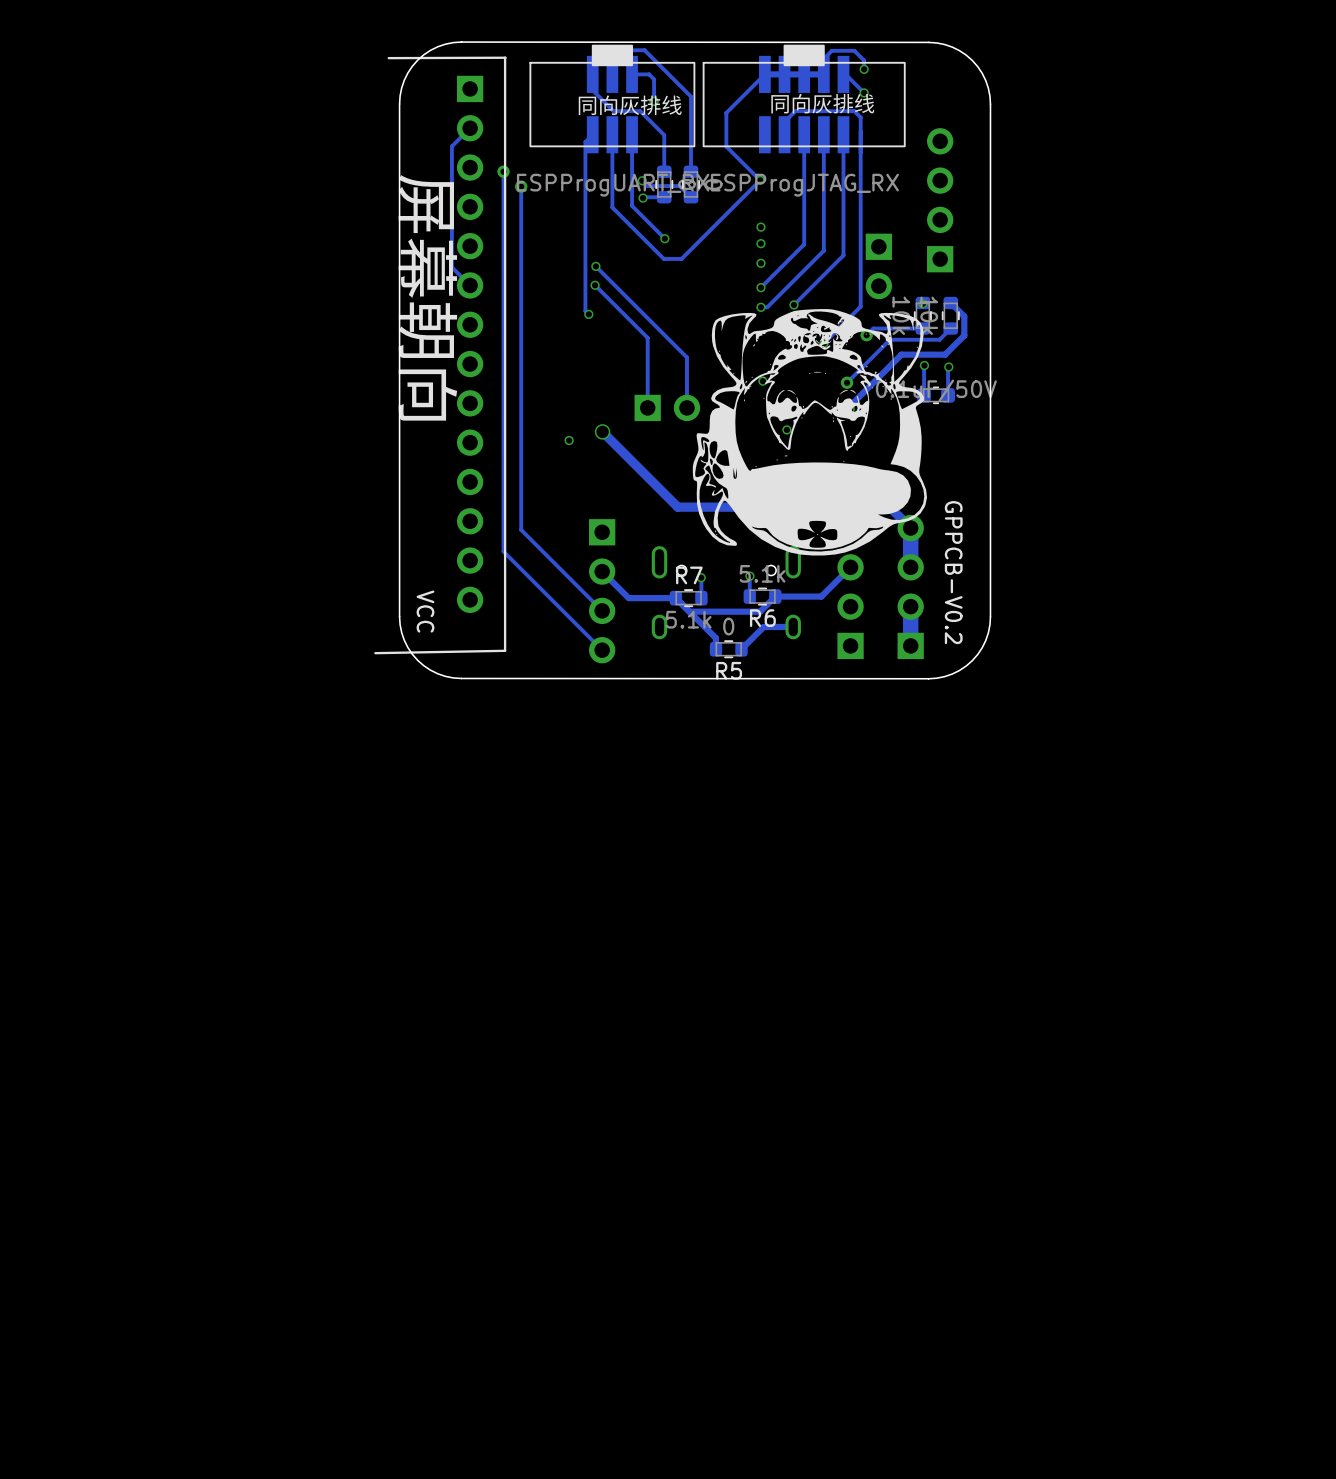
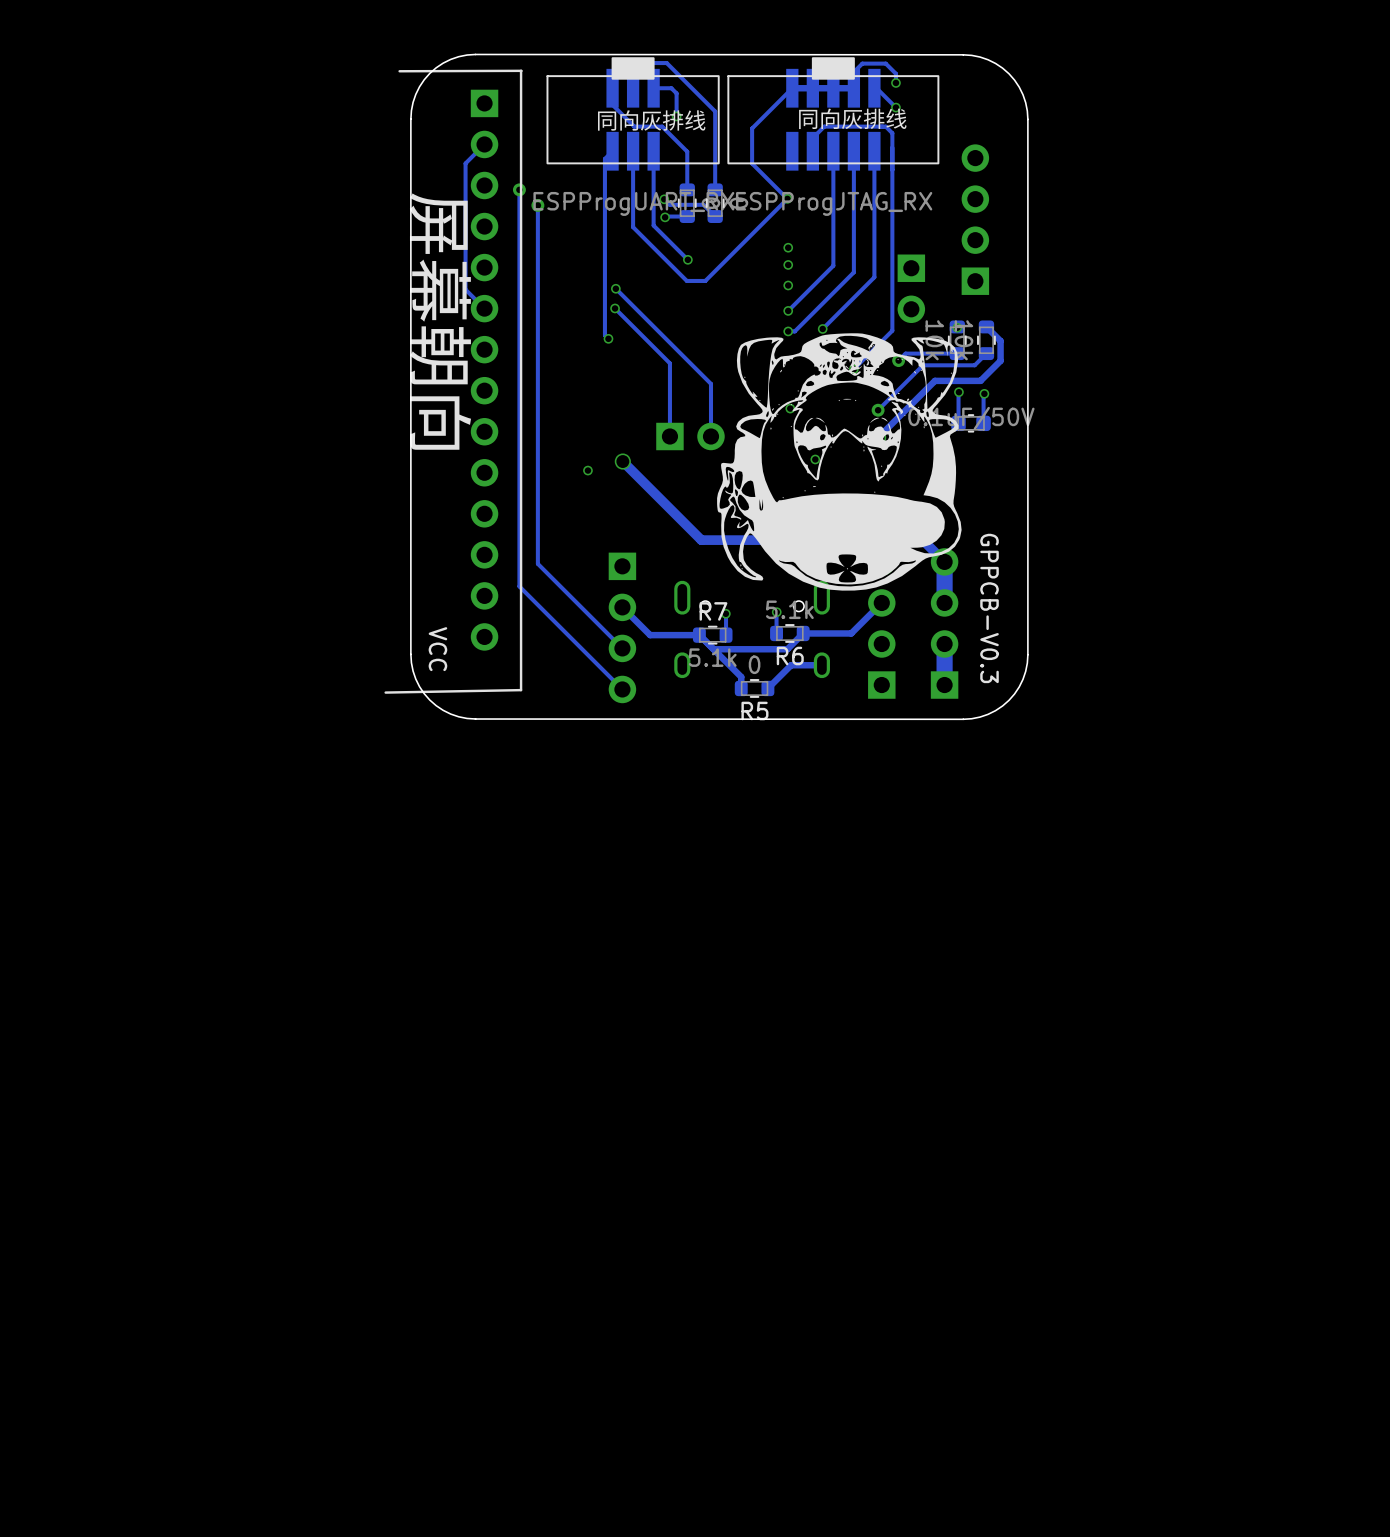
text: GPPCB-V0.2 (953, 572) -> GPPCB-V0.3 (989, 608)

